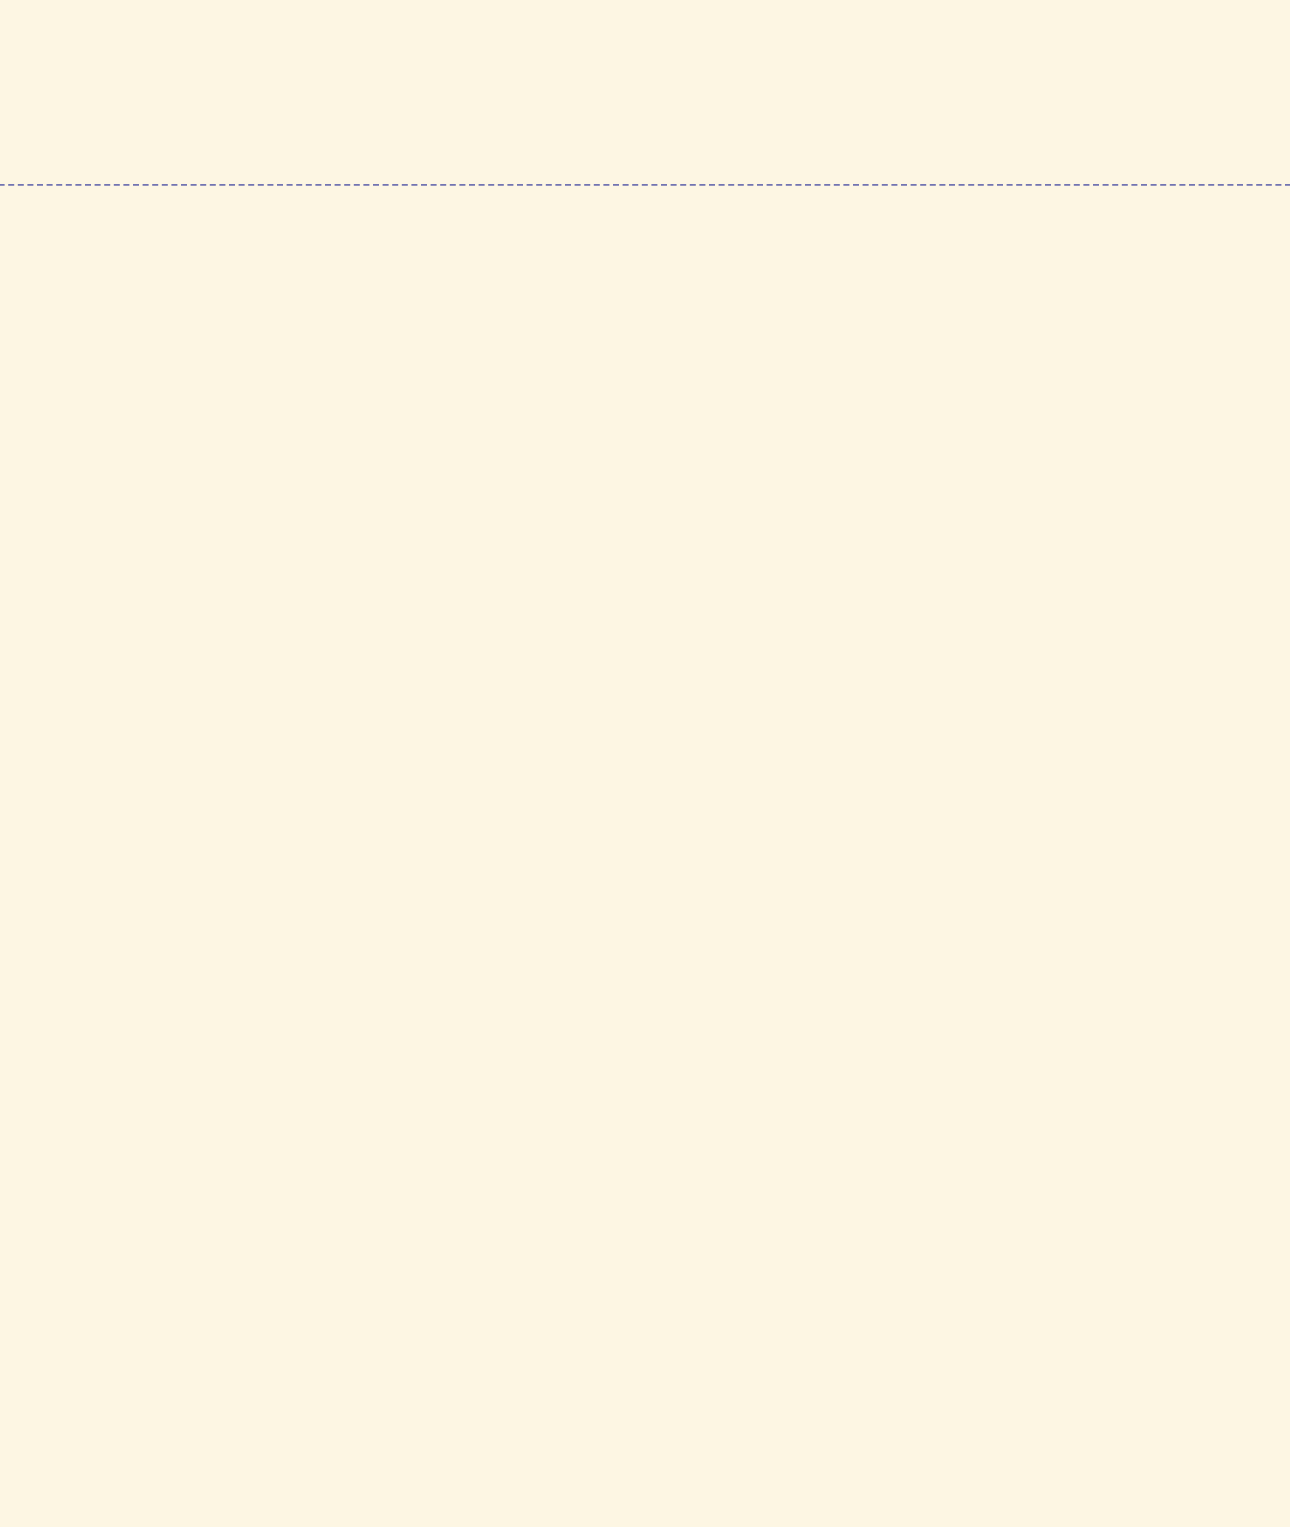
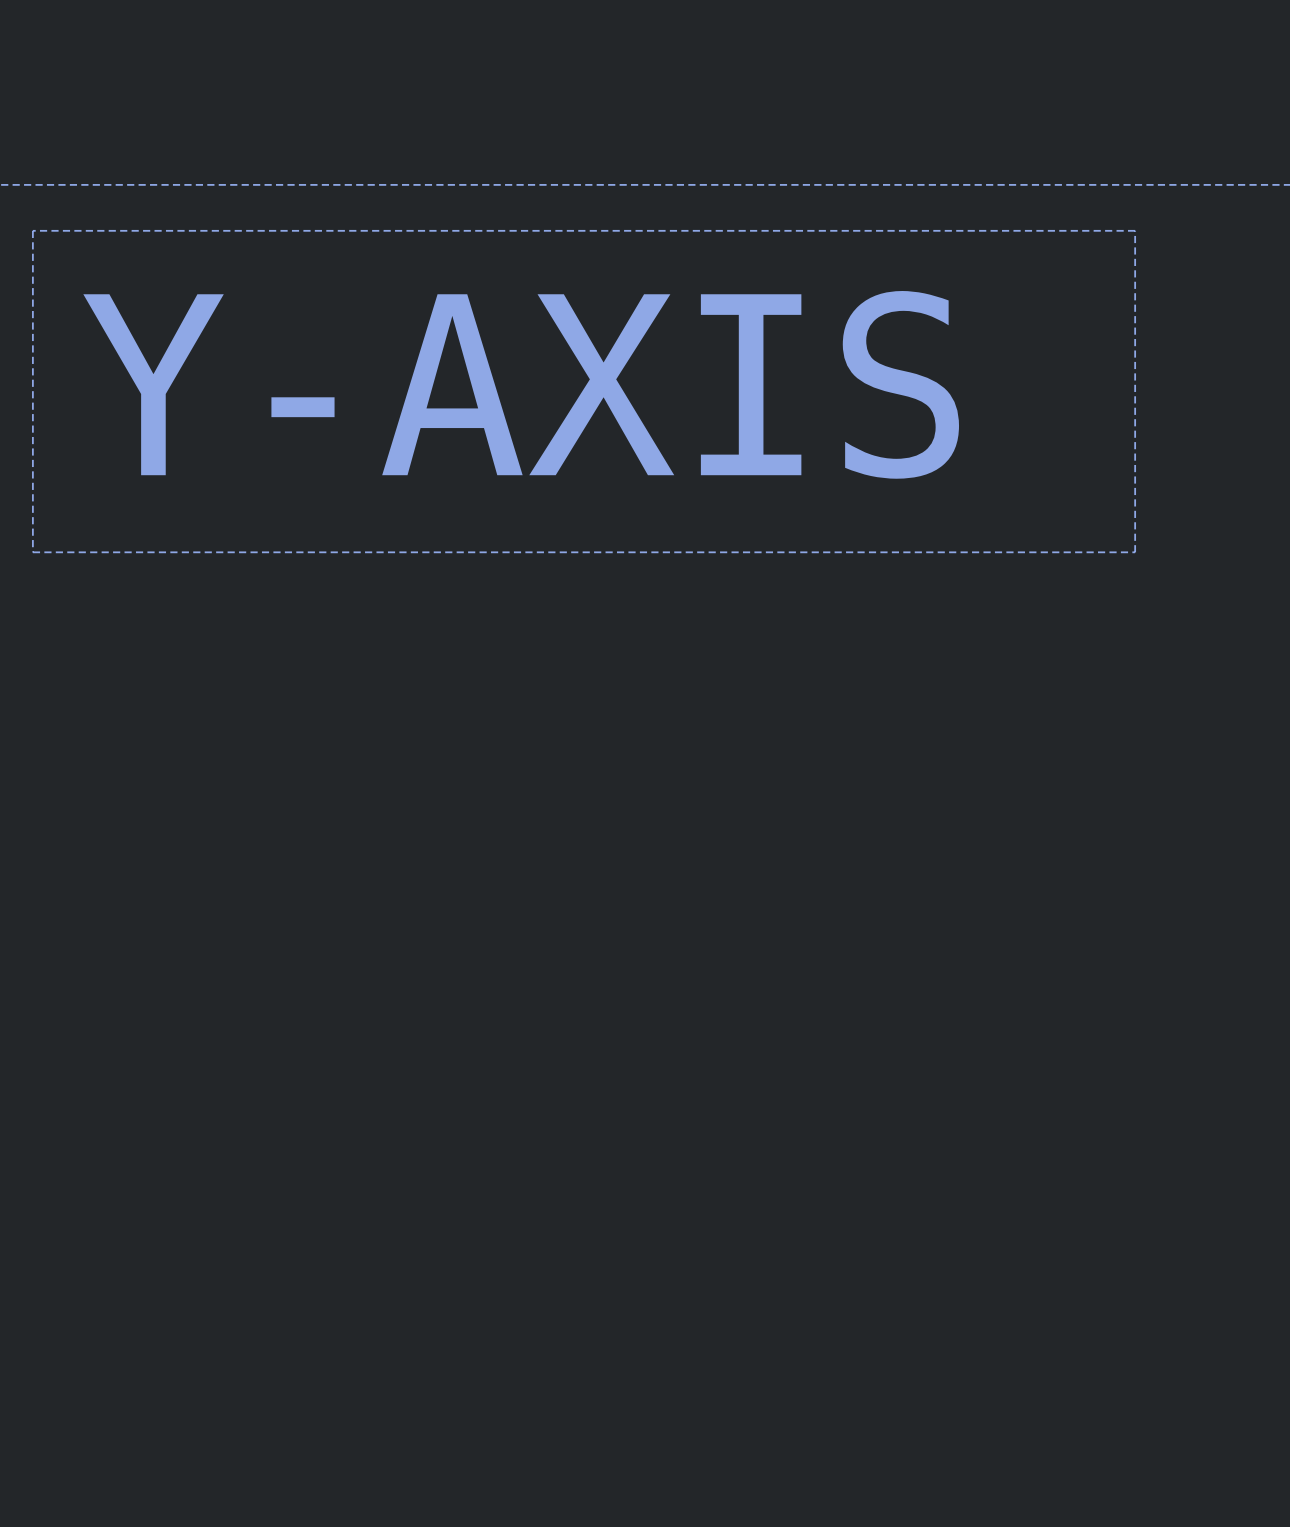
line: none -> (32, 230) (1135, 230) (1135, 552) (32, 552) (32, 230)
text: none -> Y-AXIS (521, 384)

